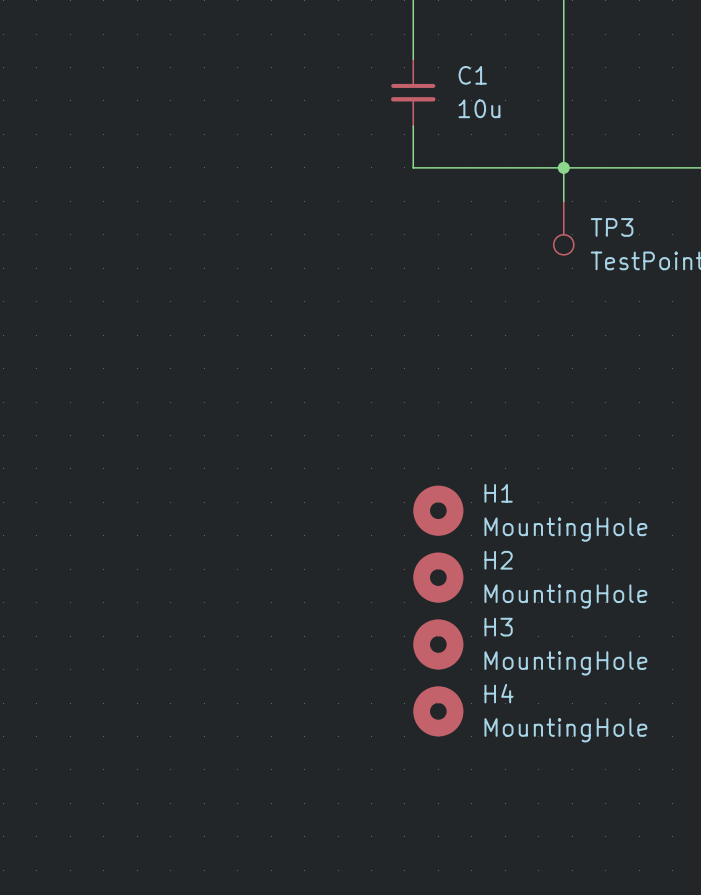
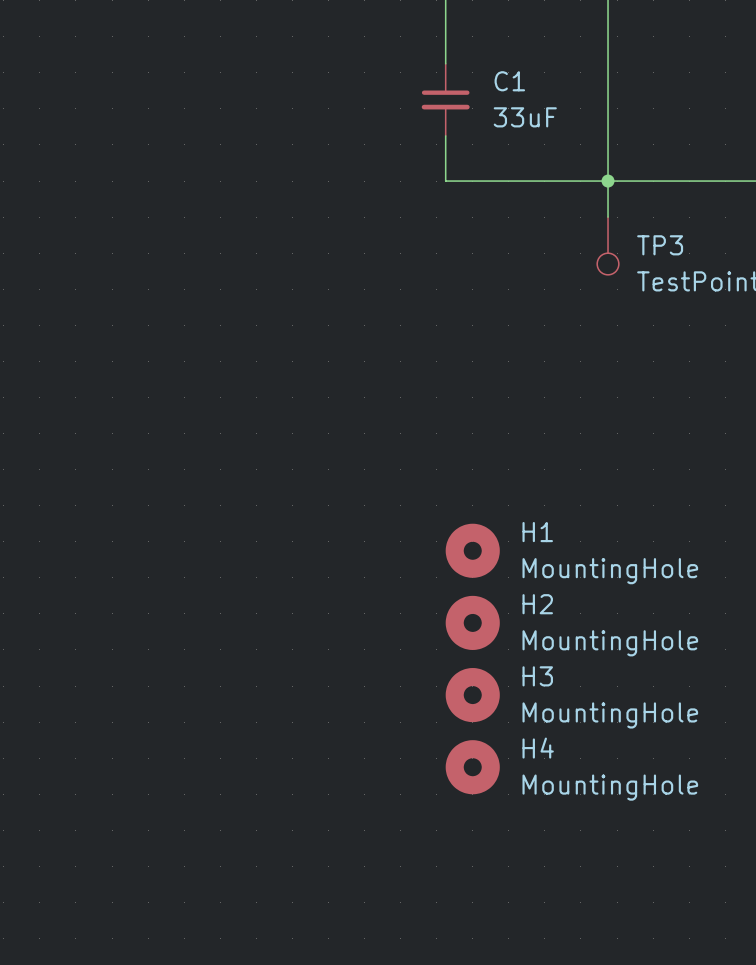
C1 value: 10u (479, 108) -> 33uF (525, 117)

